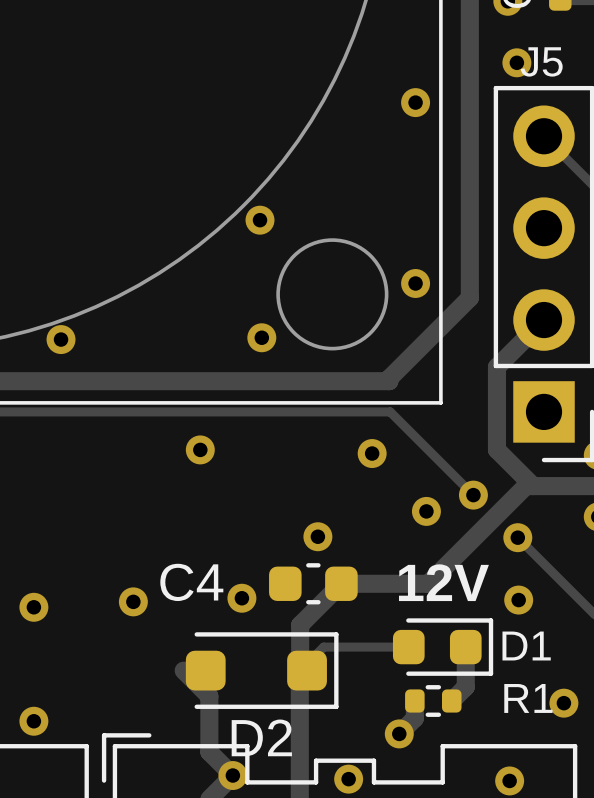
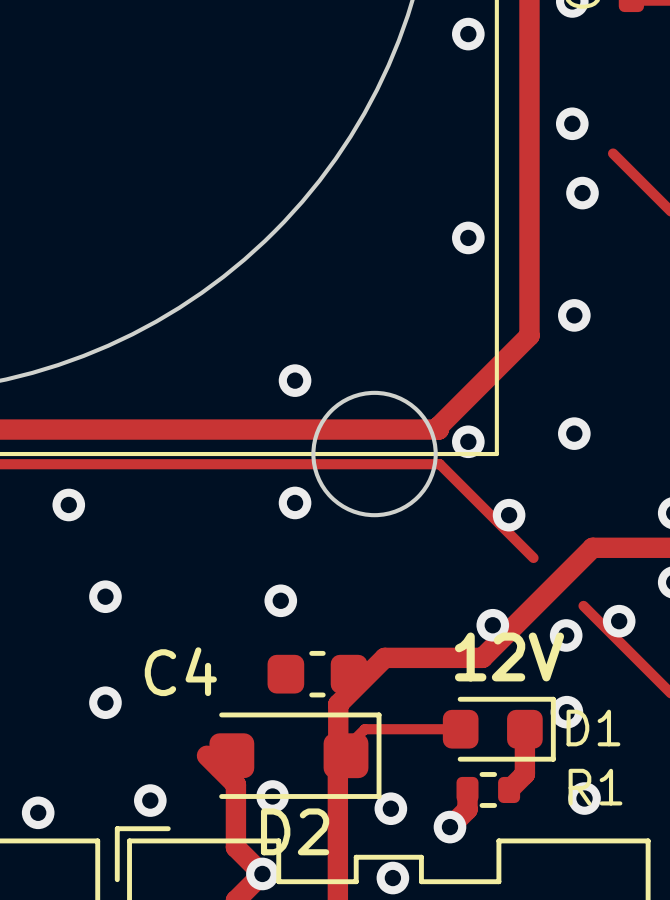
via: none -> (468, 34)
via: (516, 62) -> none
via: (415, 102) -> none
via: none -> (572, 123)
via: none -> (582, 193)
via: none -> (468, 237)
via: (260, 220) -> none
J5: (544, 274) -> none
via: none -> (574, 315)
via: (415, 283) -> none
round board edge position: (332, 294) -> (374, 454)
track: (544, 320) (496, 367) (496, 449) (533, 486) -> none
via: (61, 339) -> none
via: none -> (574, 433)
via: none -> (468, 441)
via: none -> (295, 502)
via: none -> (68, 504)
via: (200, 449) -> none
via: (372, 453) -> none
via: none -> (509, 515)
via: (473, 495) -> none
via: (426, 511) -> none
via: none -> (105, 596)
via: none -> (280, 600)
via: (317, 536) -> none
via position: (517, 537) -> (566, 635)
via: none -> (619, 621)
via: none -> (492, 625)
C4 position: (313, 583) -> (317, 674)
via: (241, 598) -> none
via: (518, 600) -> none
via: (133, 601) -> none
via: (33, 607) -> none
via: none -> (105, 702)
via: none -> (566, 712)
via: (563, 703) -> none
via: none -> (272, 796)
via: none -> (584, 798)
via: none -> (150, 800)
via: none -> (390, 808)
via: (509, 780) -> none

